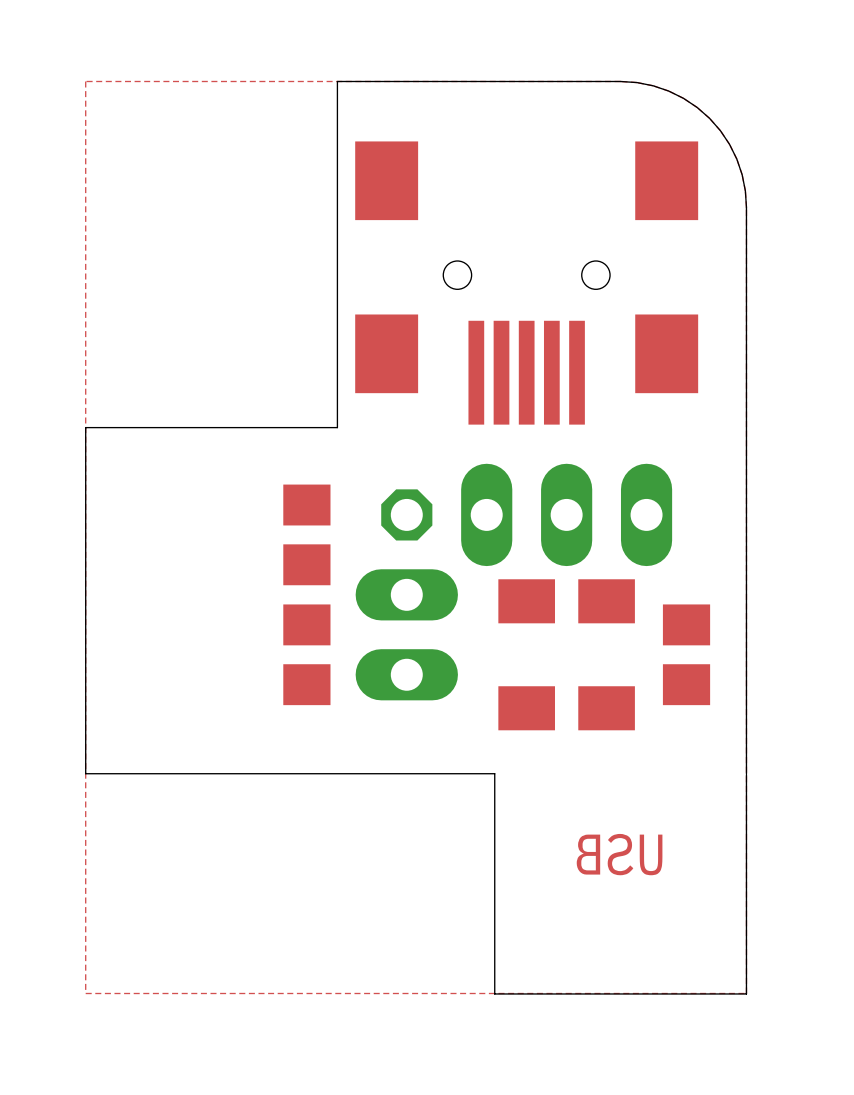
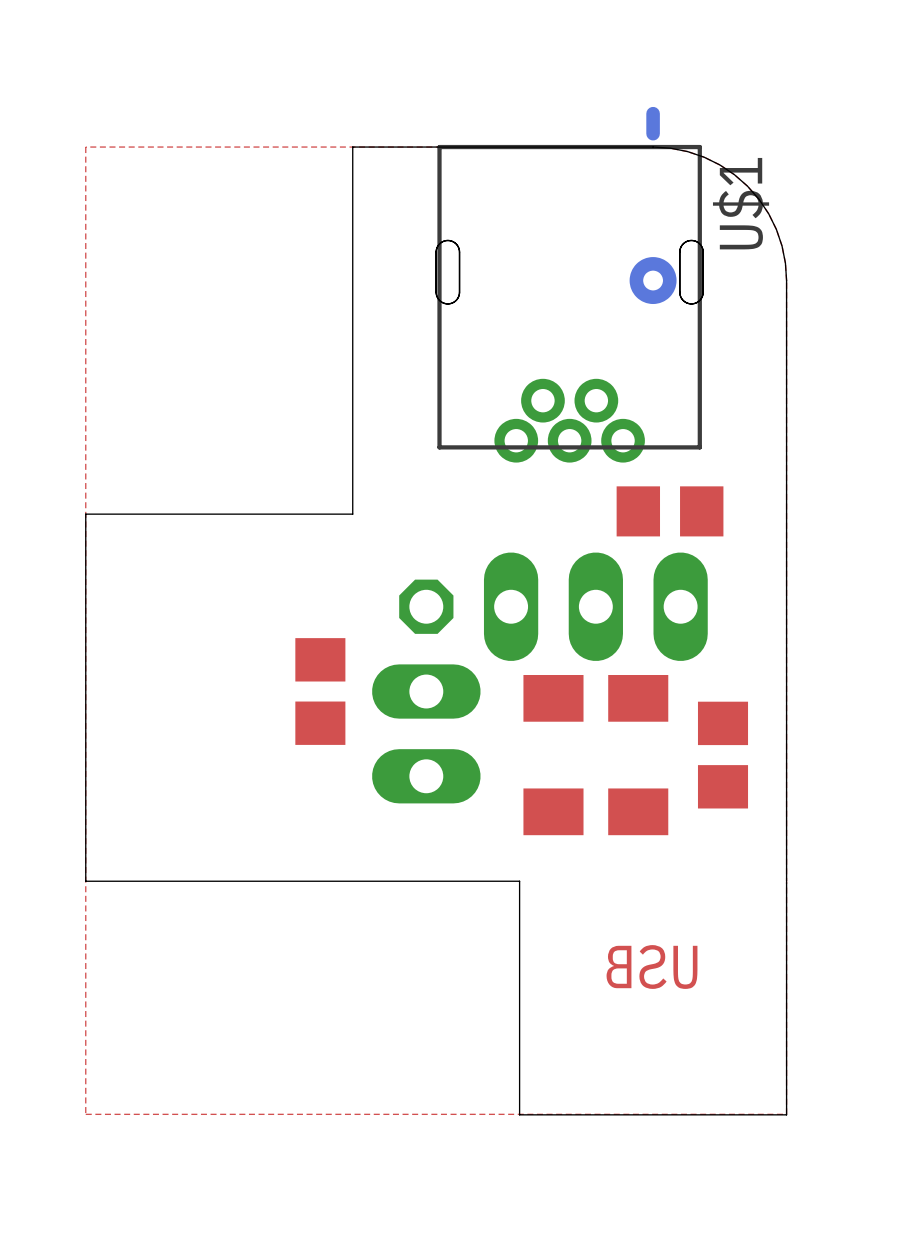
bottom track: none -> (653, 113) (653, 133)
drawing: none -> [629, 257, 677, 305]
U$1: none -> (569, 303)
part: (526, 283) -> none
part: none -> (670, 511)
part: (306, 534) -> none
part: (306, 654) -> none

